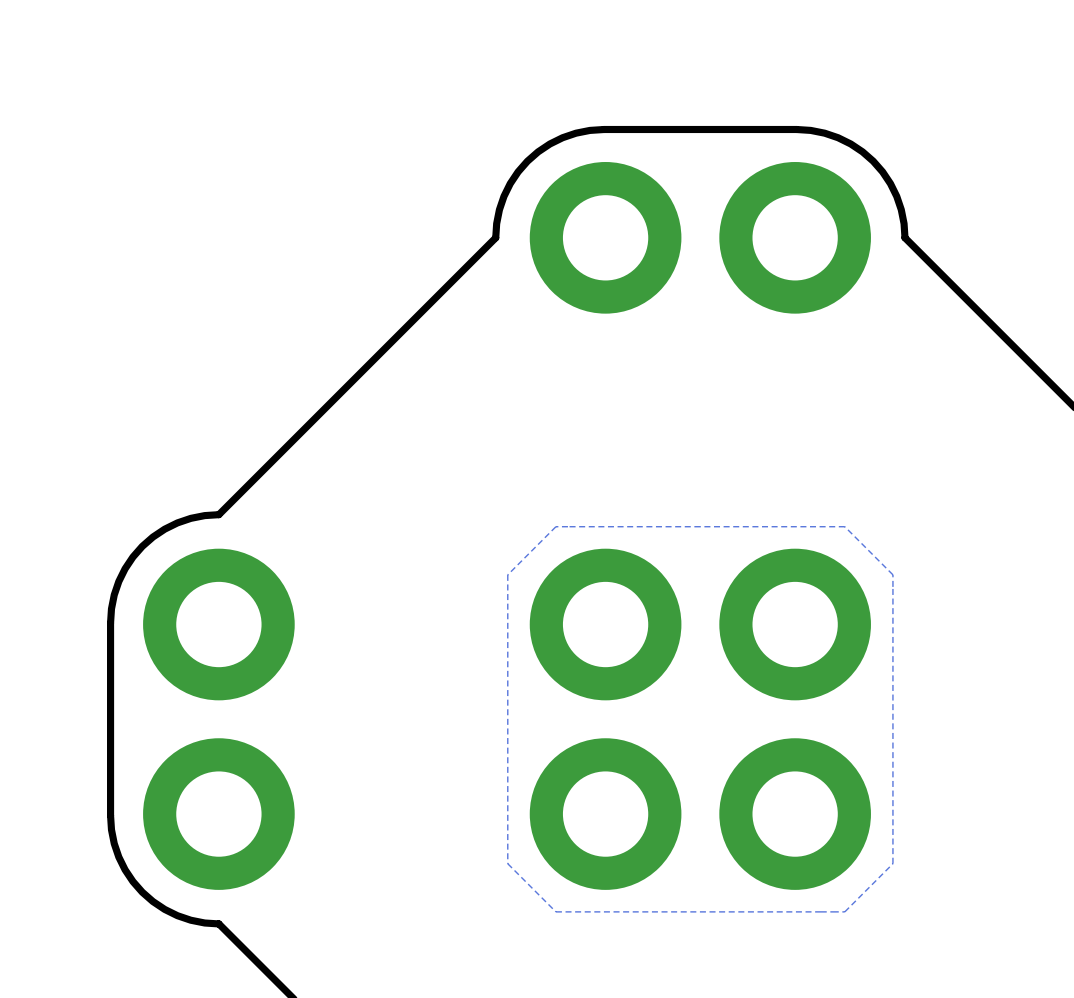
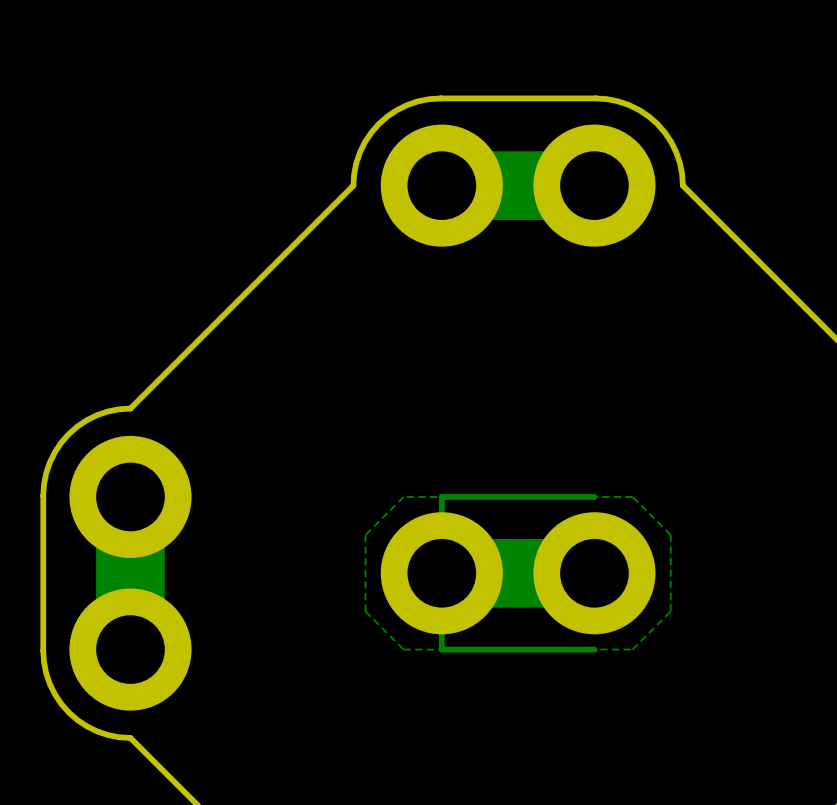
part footprint: [529, 162, 871, 314] -> [380, 124, 656, 247]
zone outline: (844, 526) (555, 526) (507, 574) (507, 863) (555, 911) (844, 911) (892, 863) (892, 574) (844, 526) -> none
part footprint: [143, 548, 295, 890] -> [69, 435, 192, 711]
part footprint: [529, 548, 871, 890] -> [380, 512, 656, 635]
track: none -> (594, 496) (441, 496) (441, 649) (594, 649)
zone outline: none -> (632, 496) (670, 535) (670, 611) (632, 649) (403, 649) (365, 611) (365, 535) (403, 496) (632, 496)

